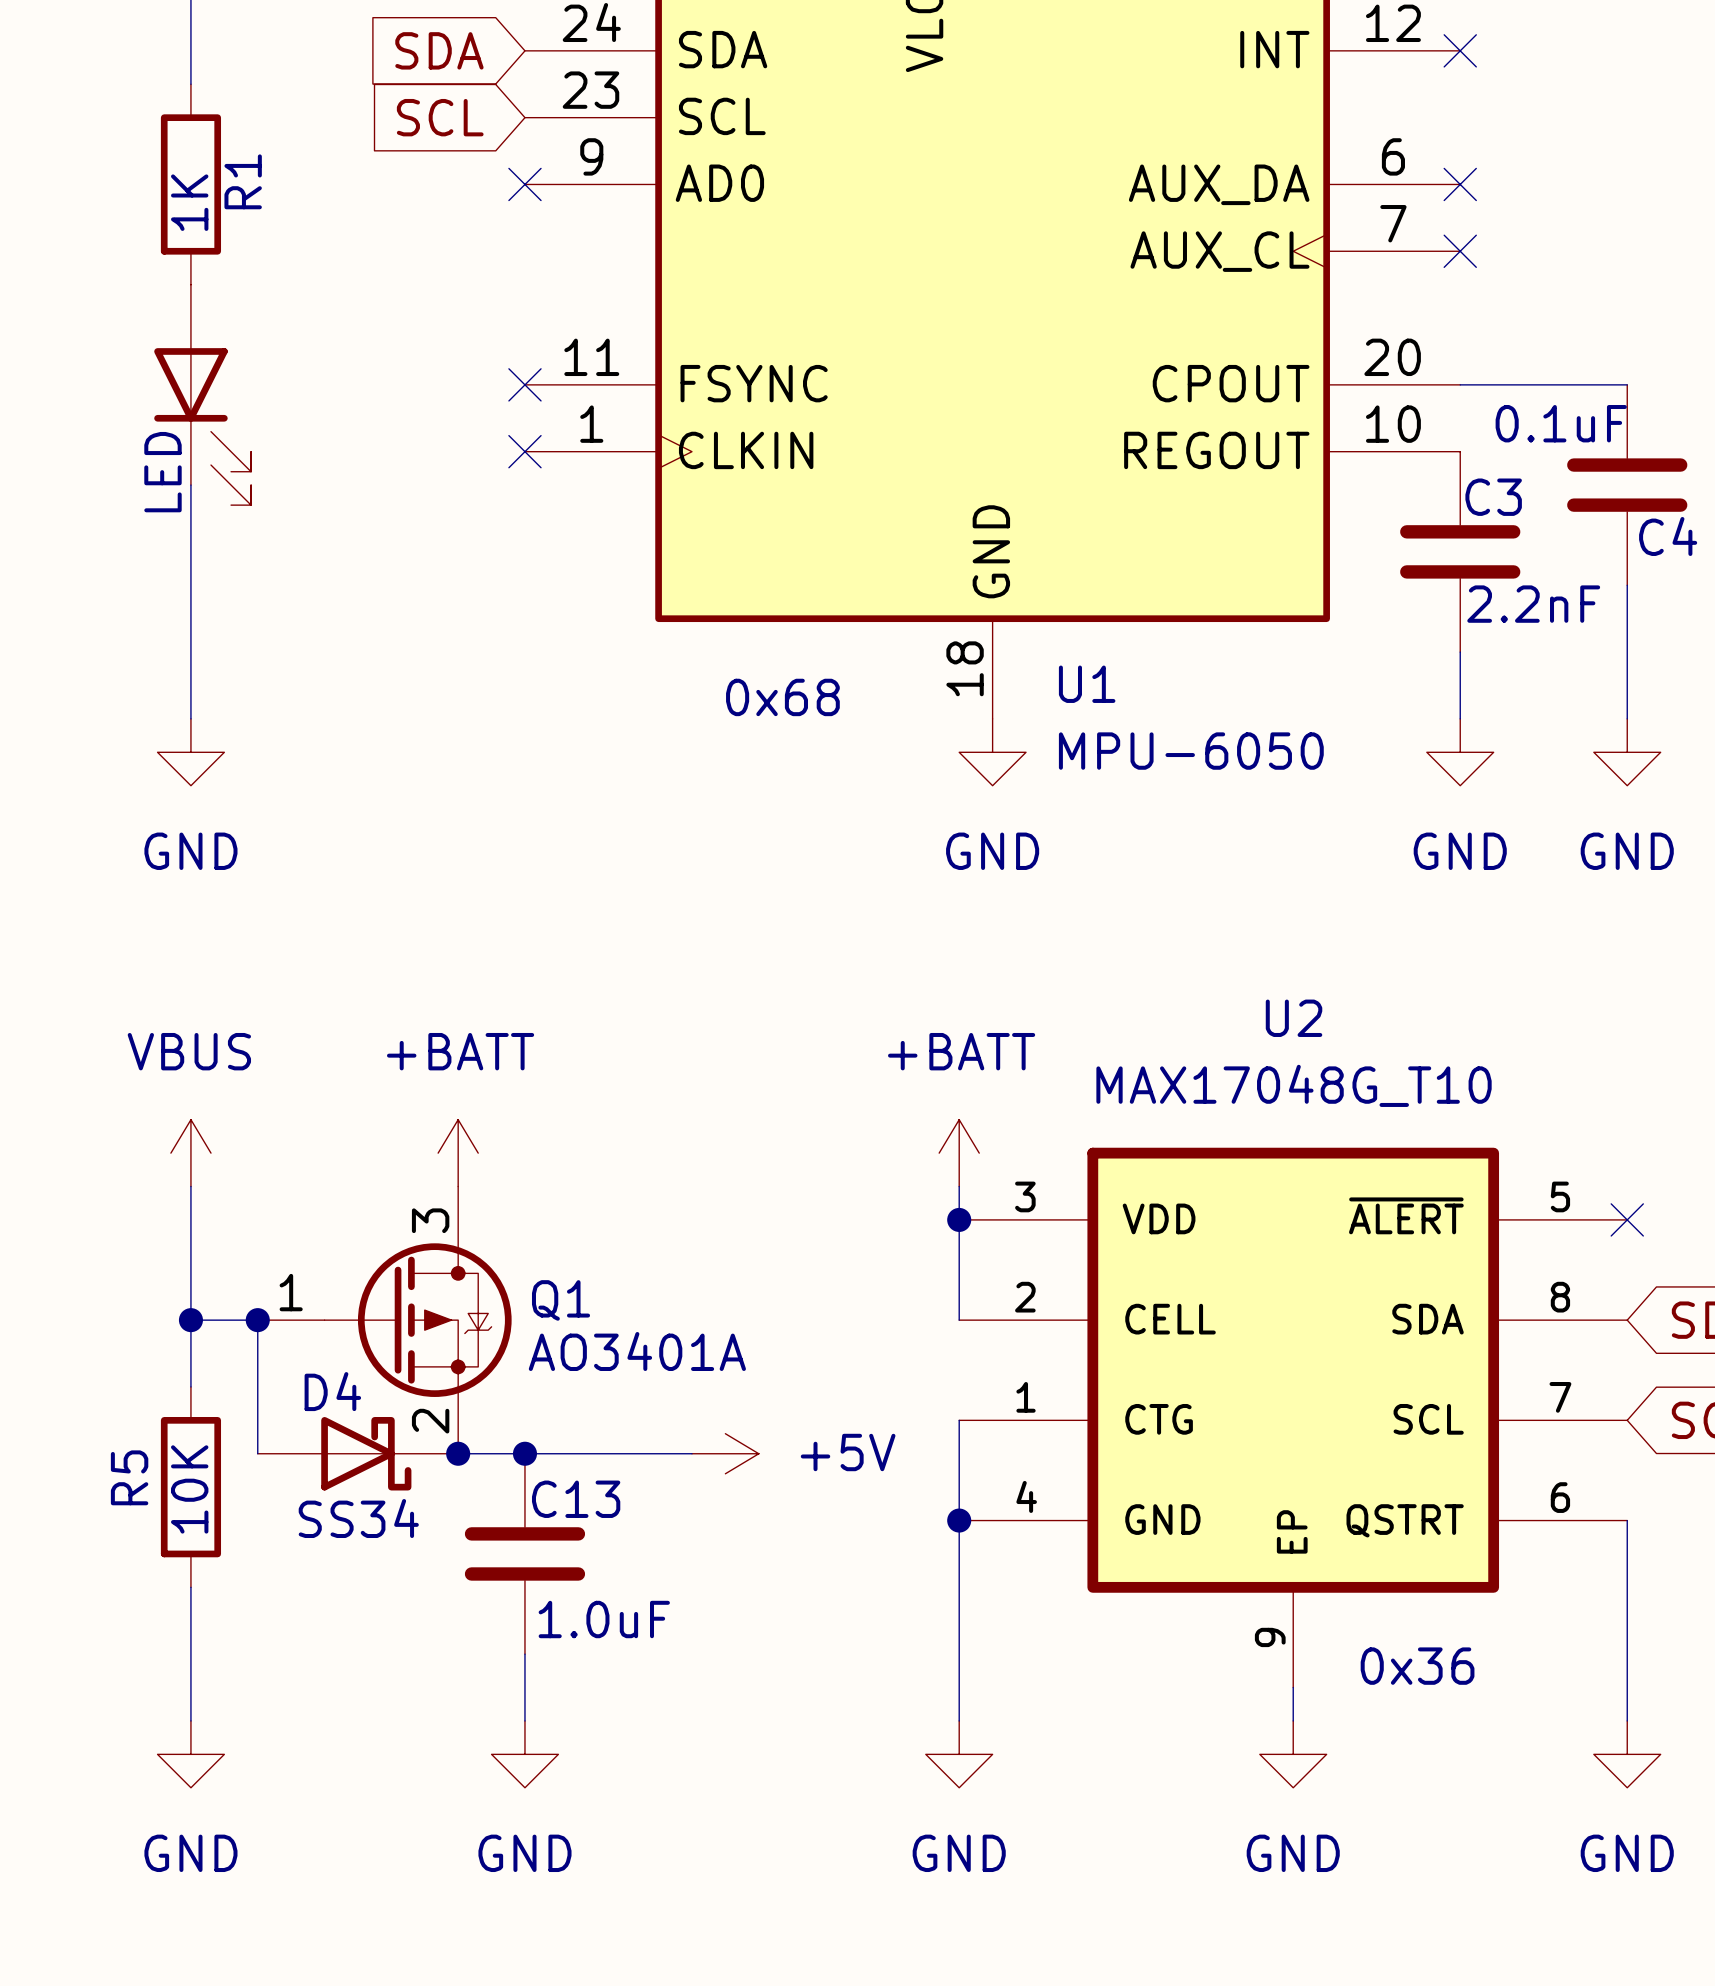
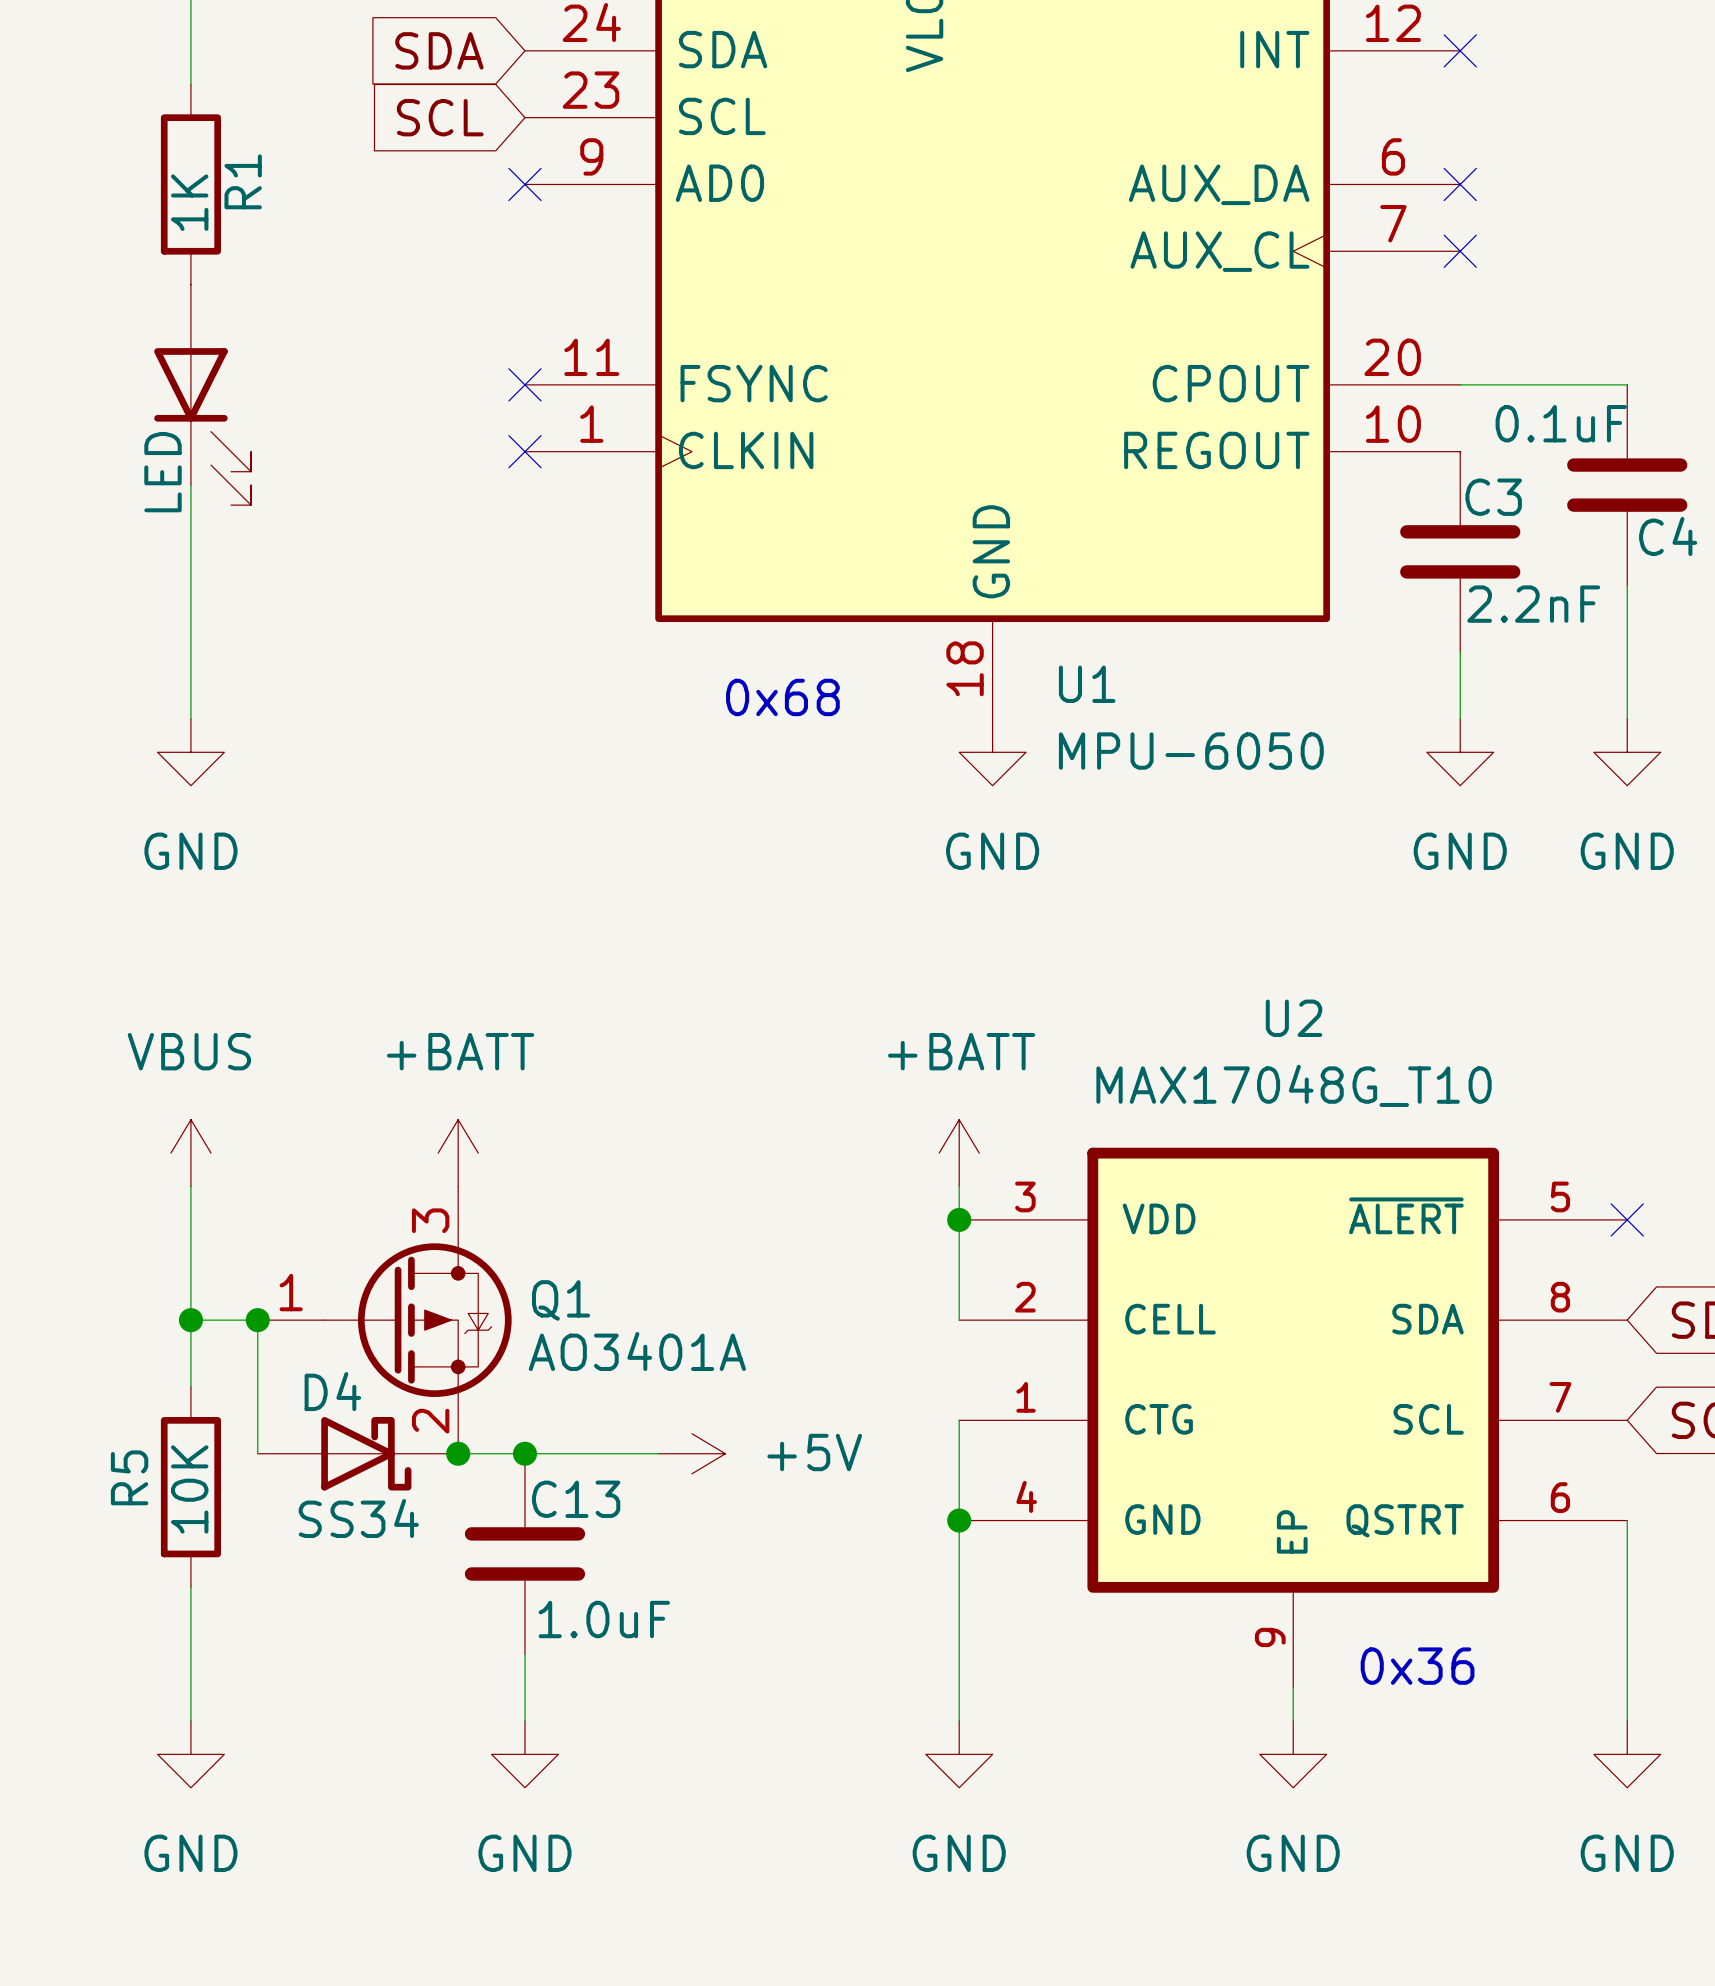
power symbol position: +5V (725, 1453) -> +5V (691, 1453)

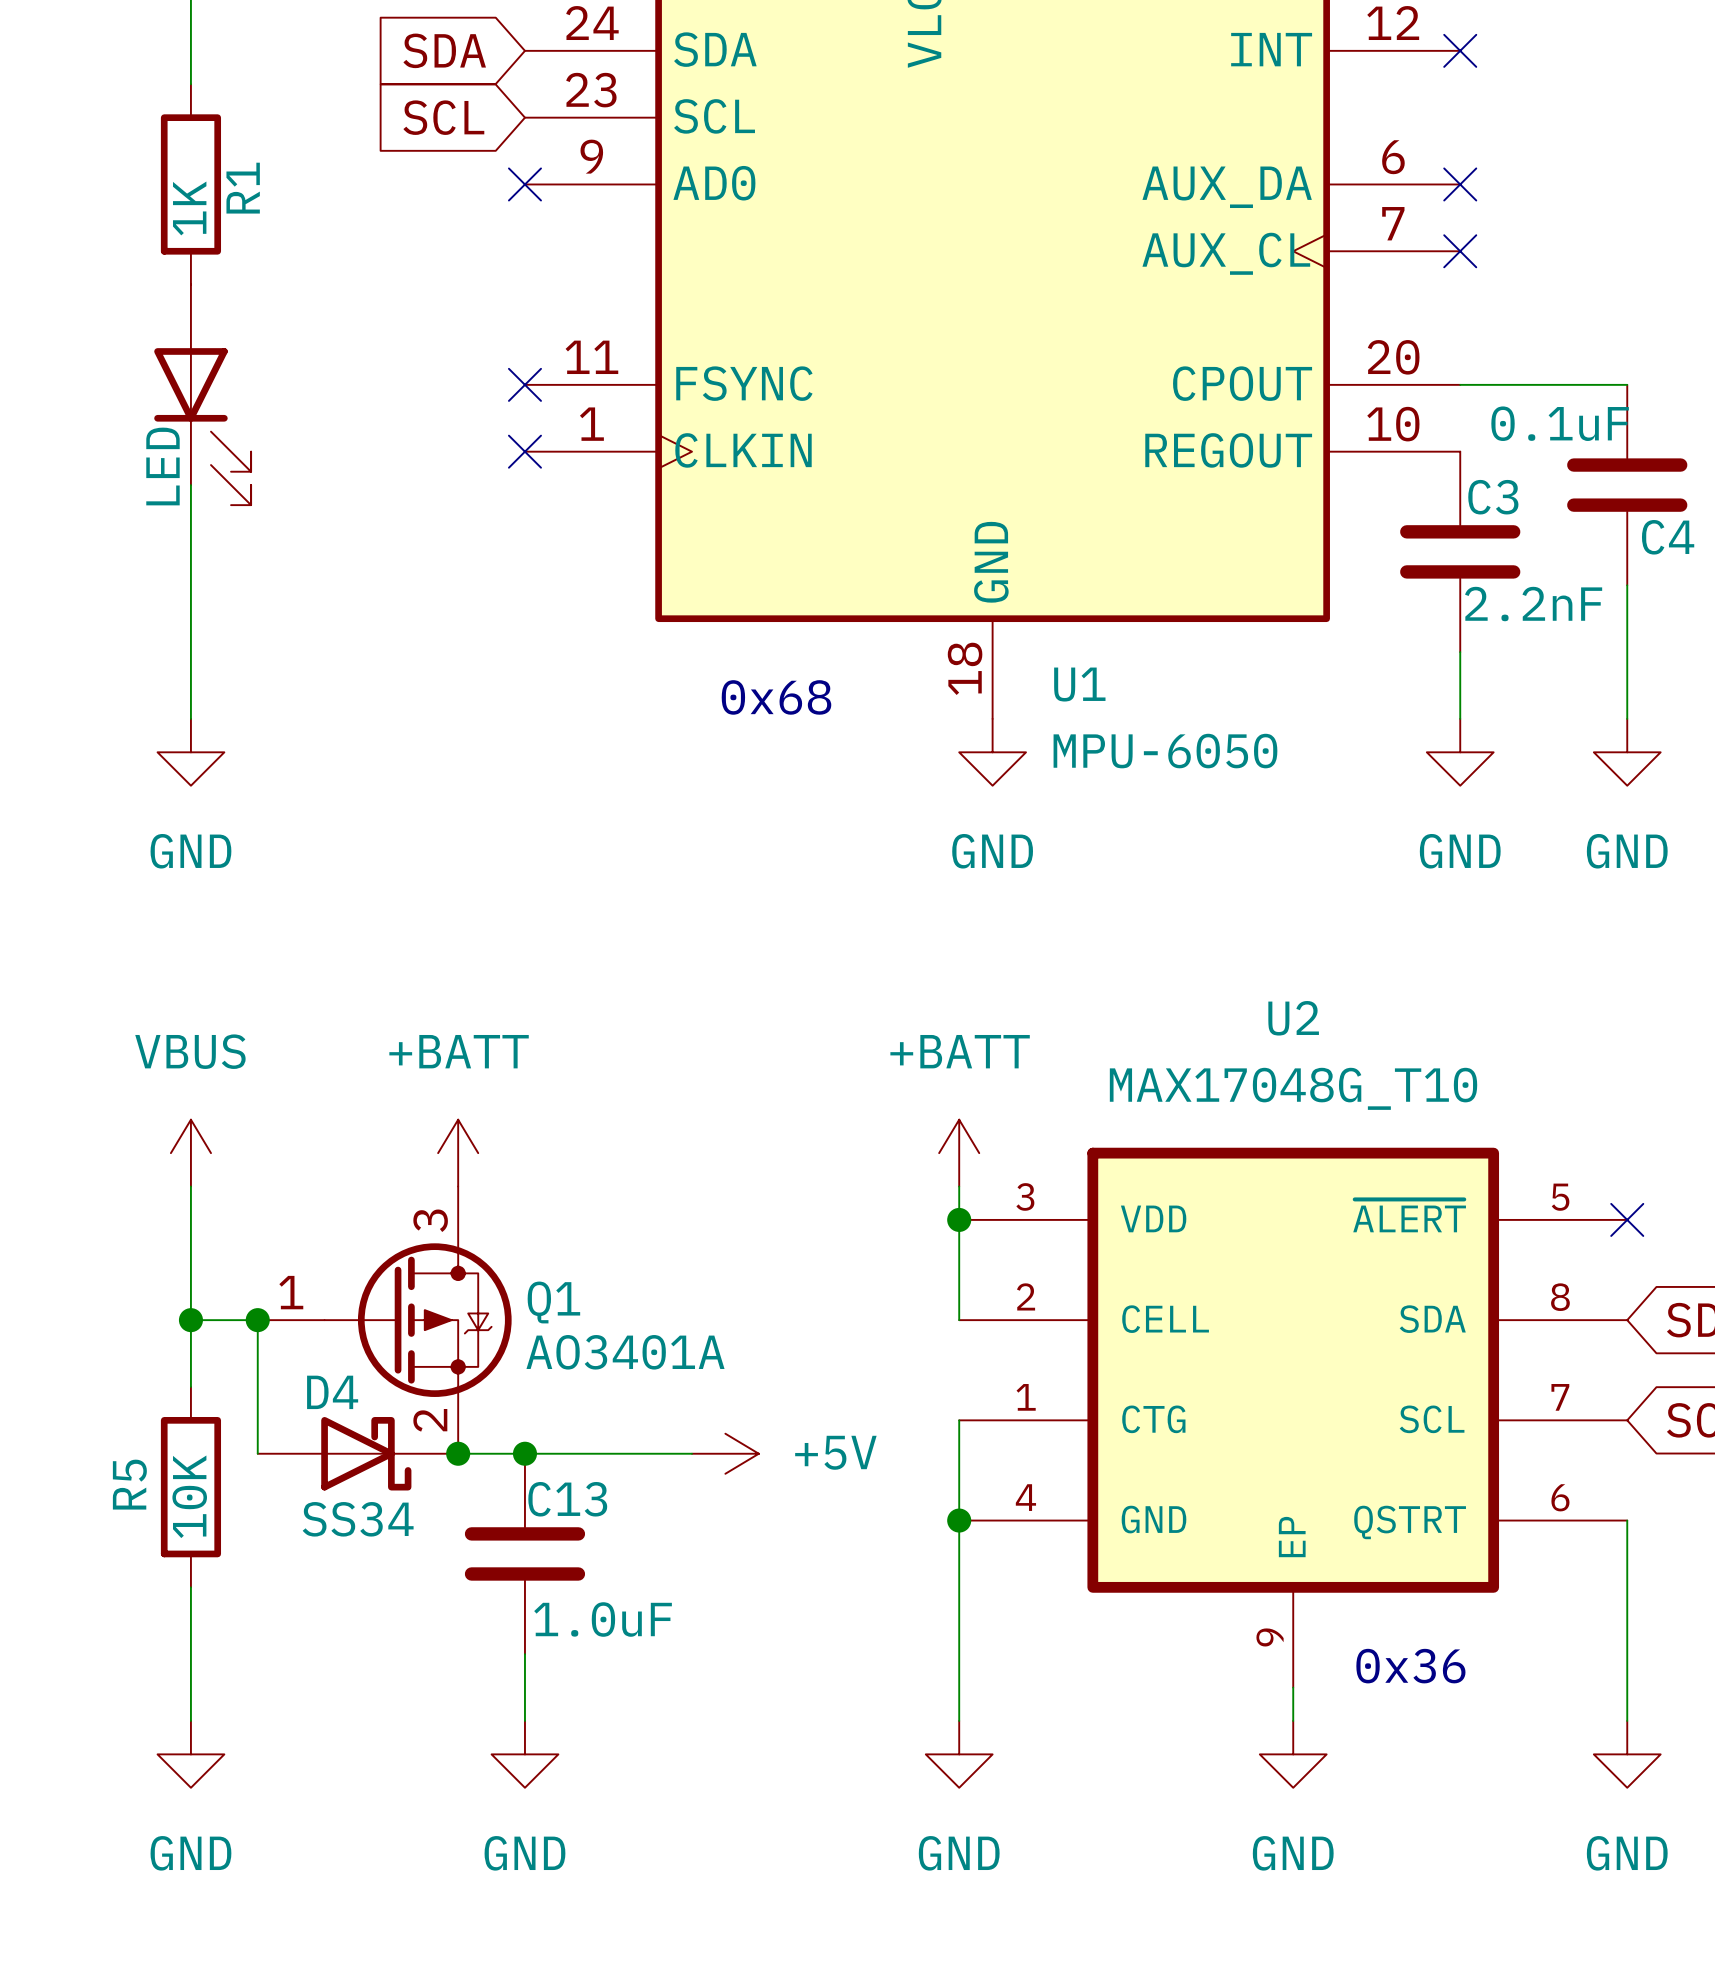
power symbol position: +5V (691, 1453) -> +5V (725, 1453)

